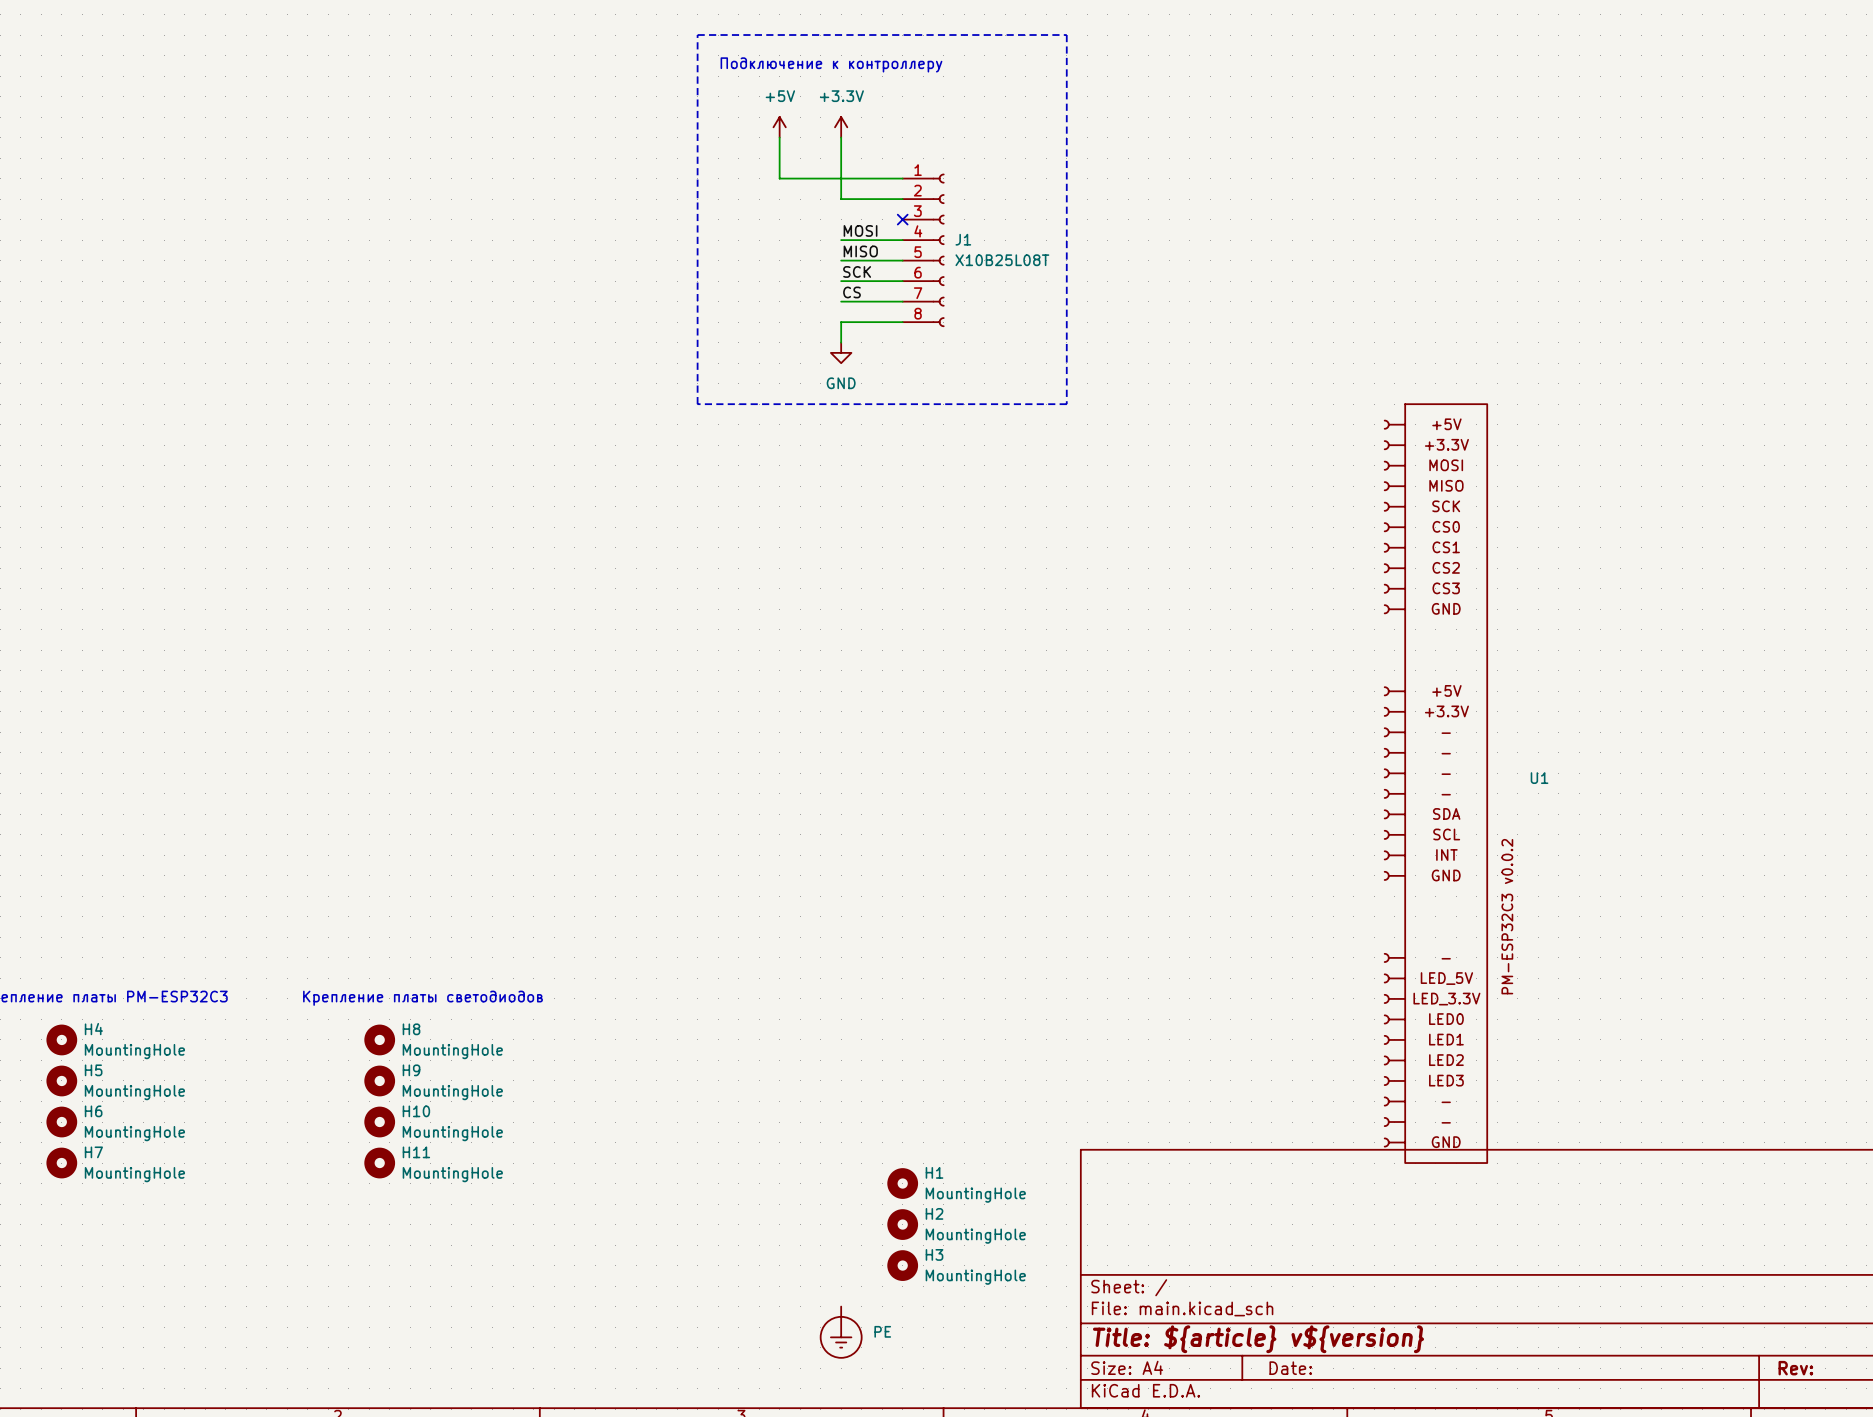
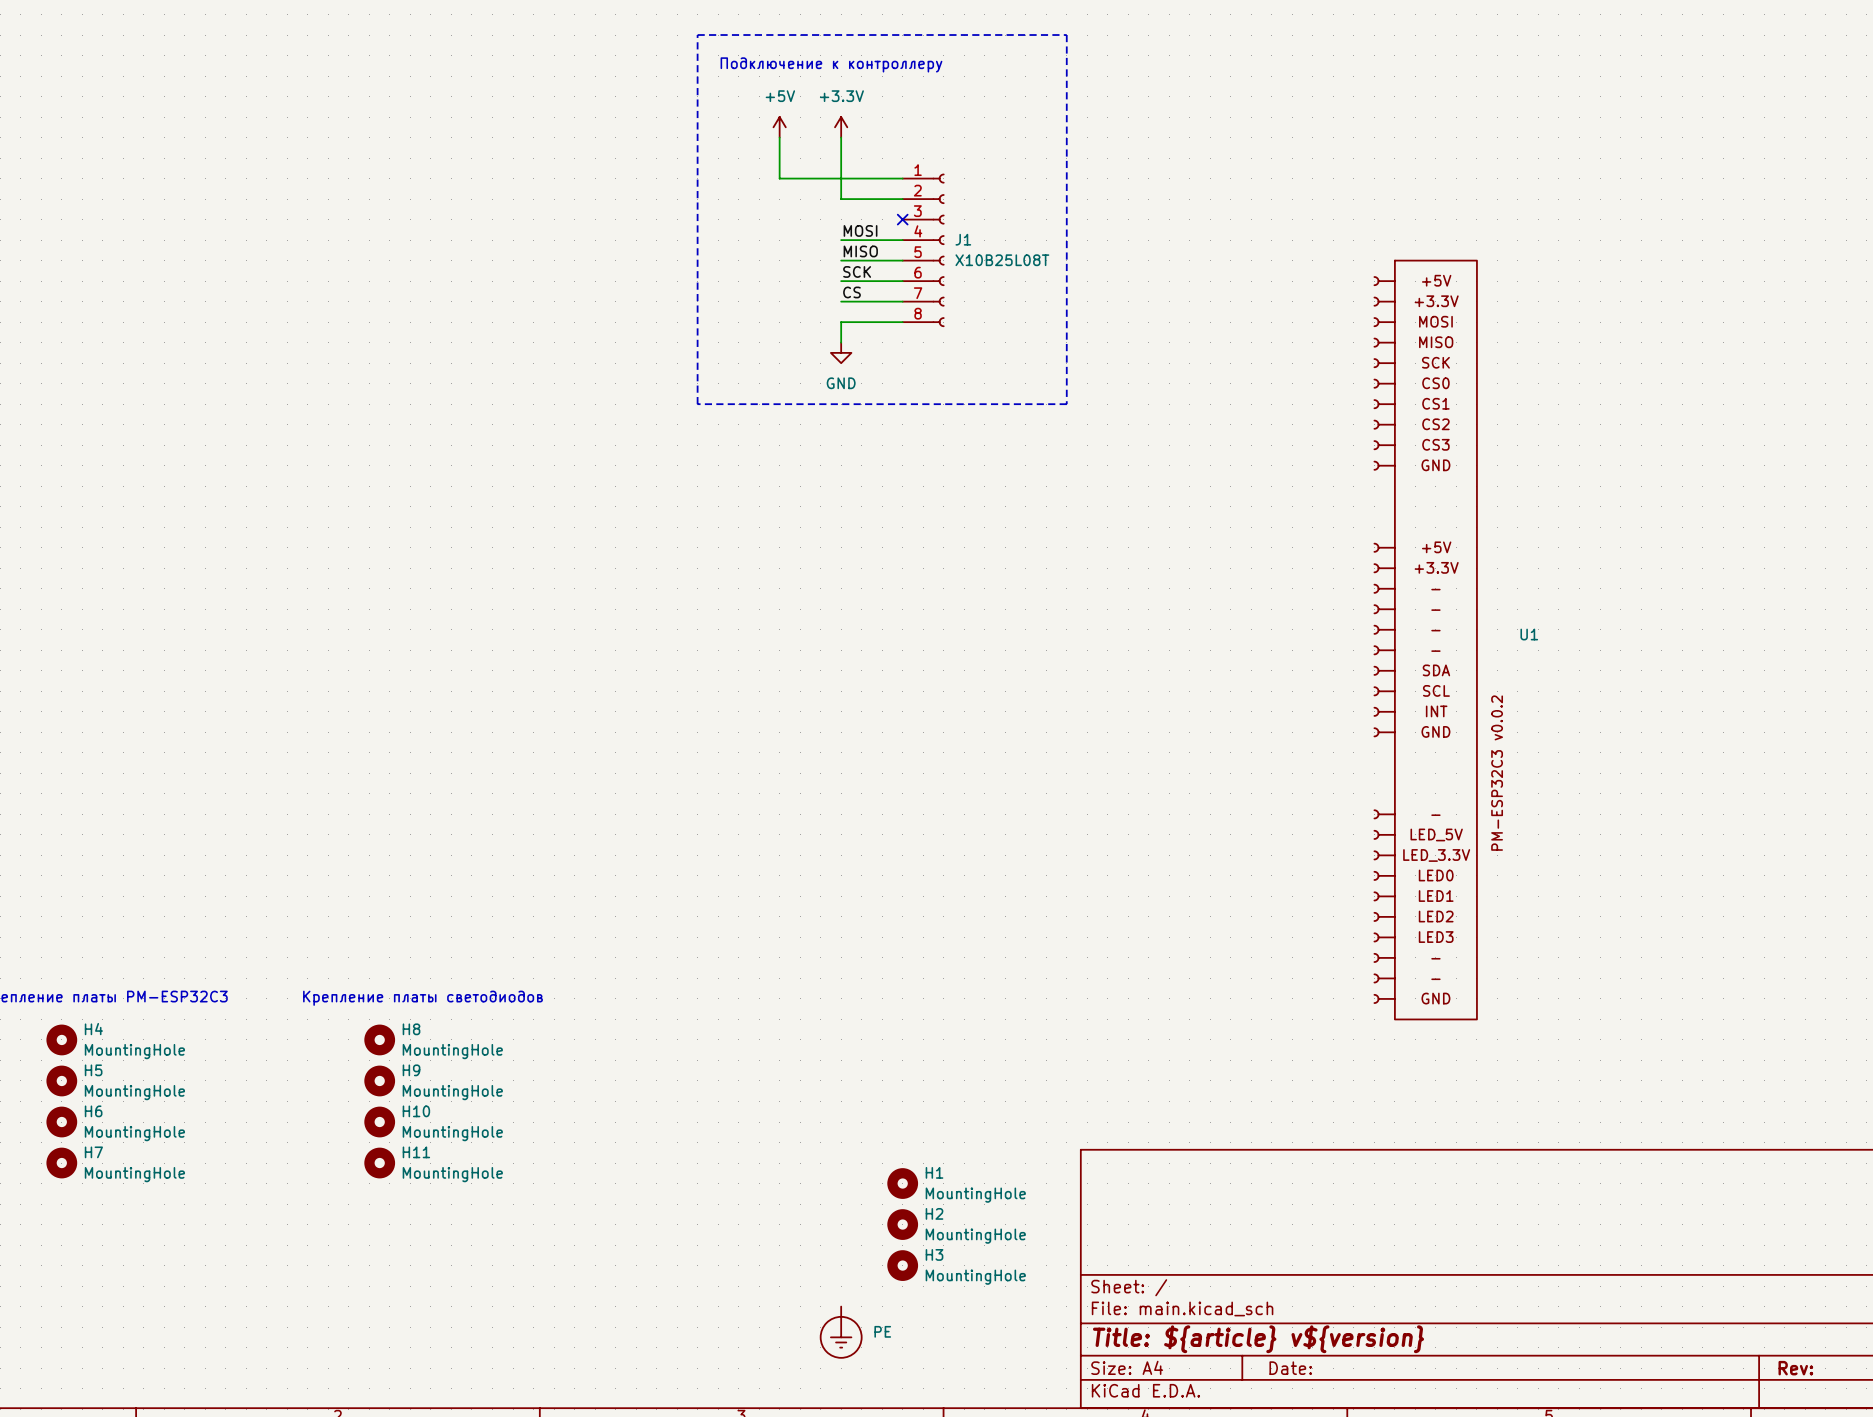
U1 position: (1435, 783) -> (1425, 640)

